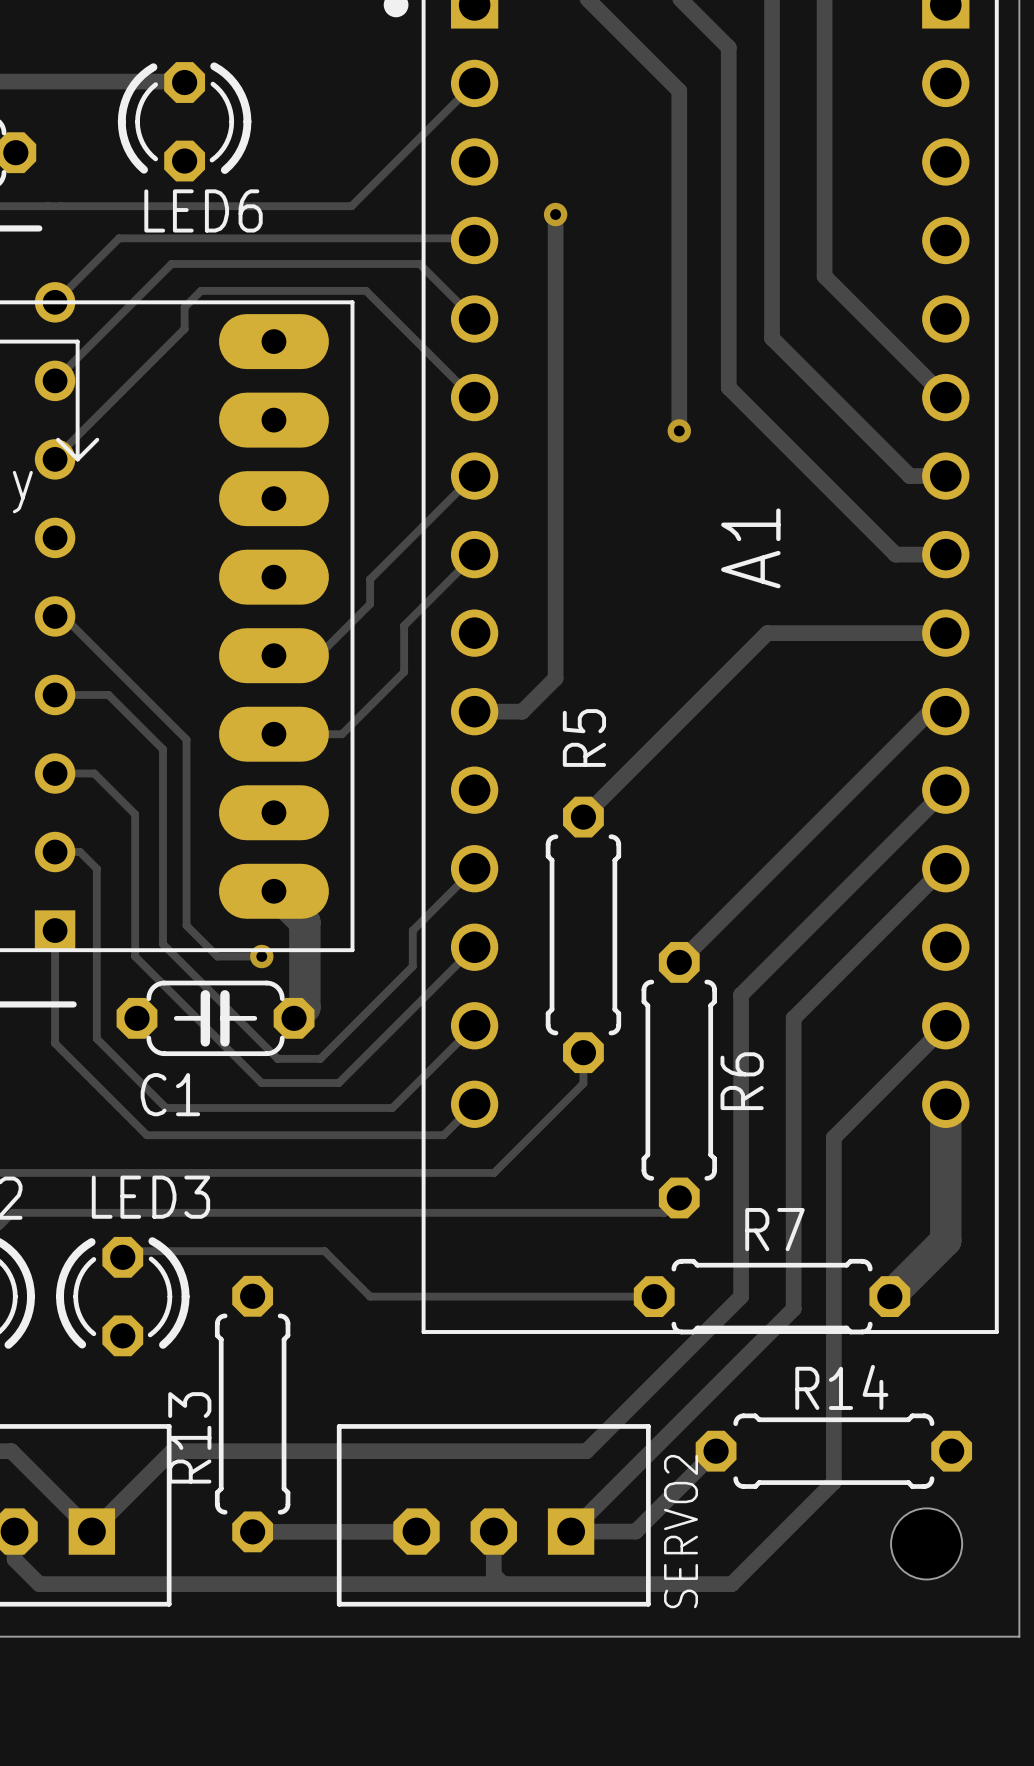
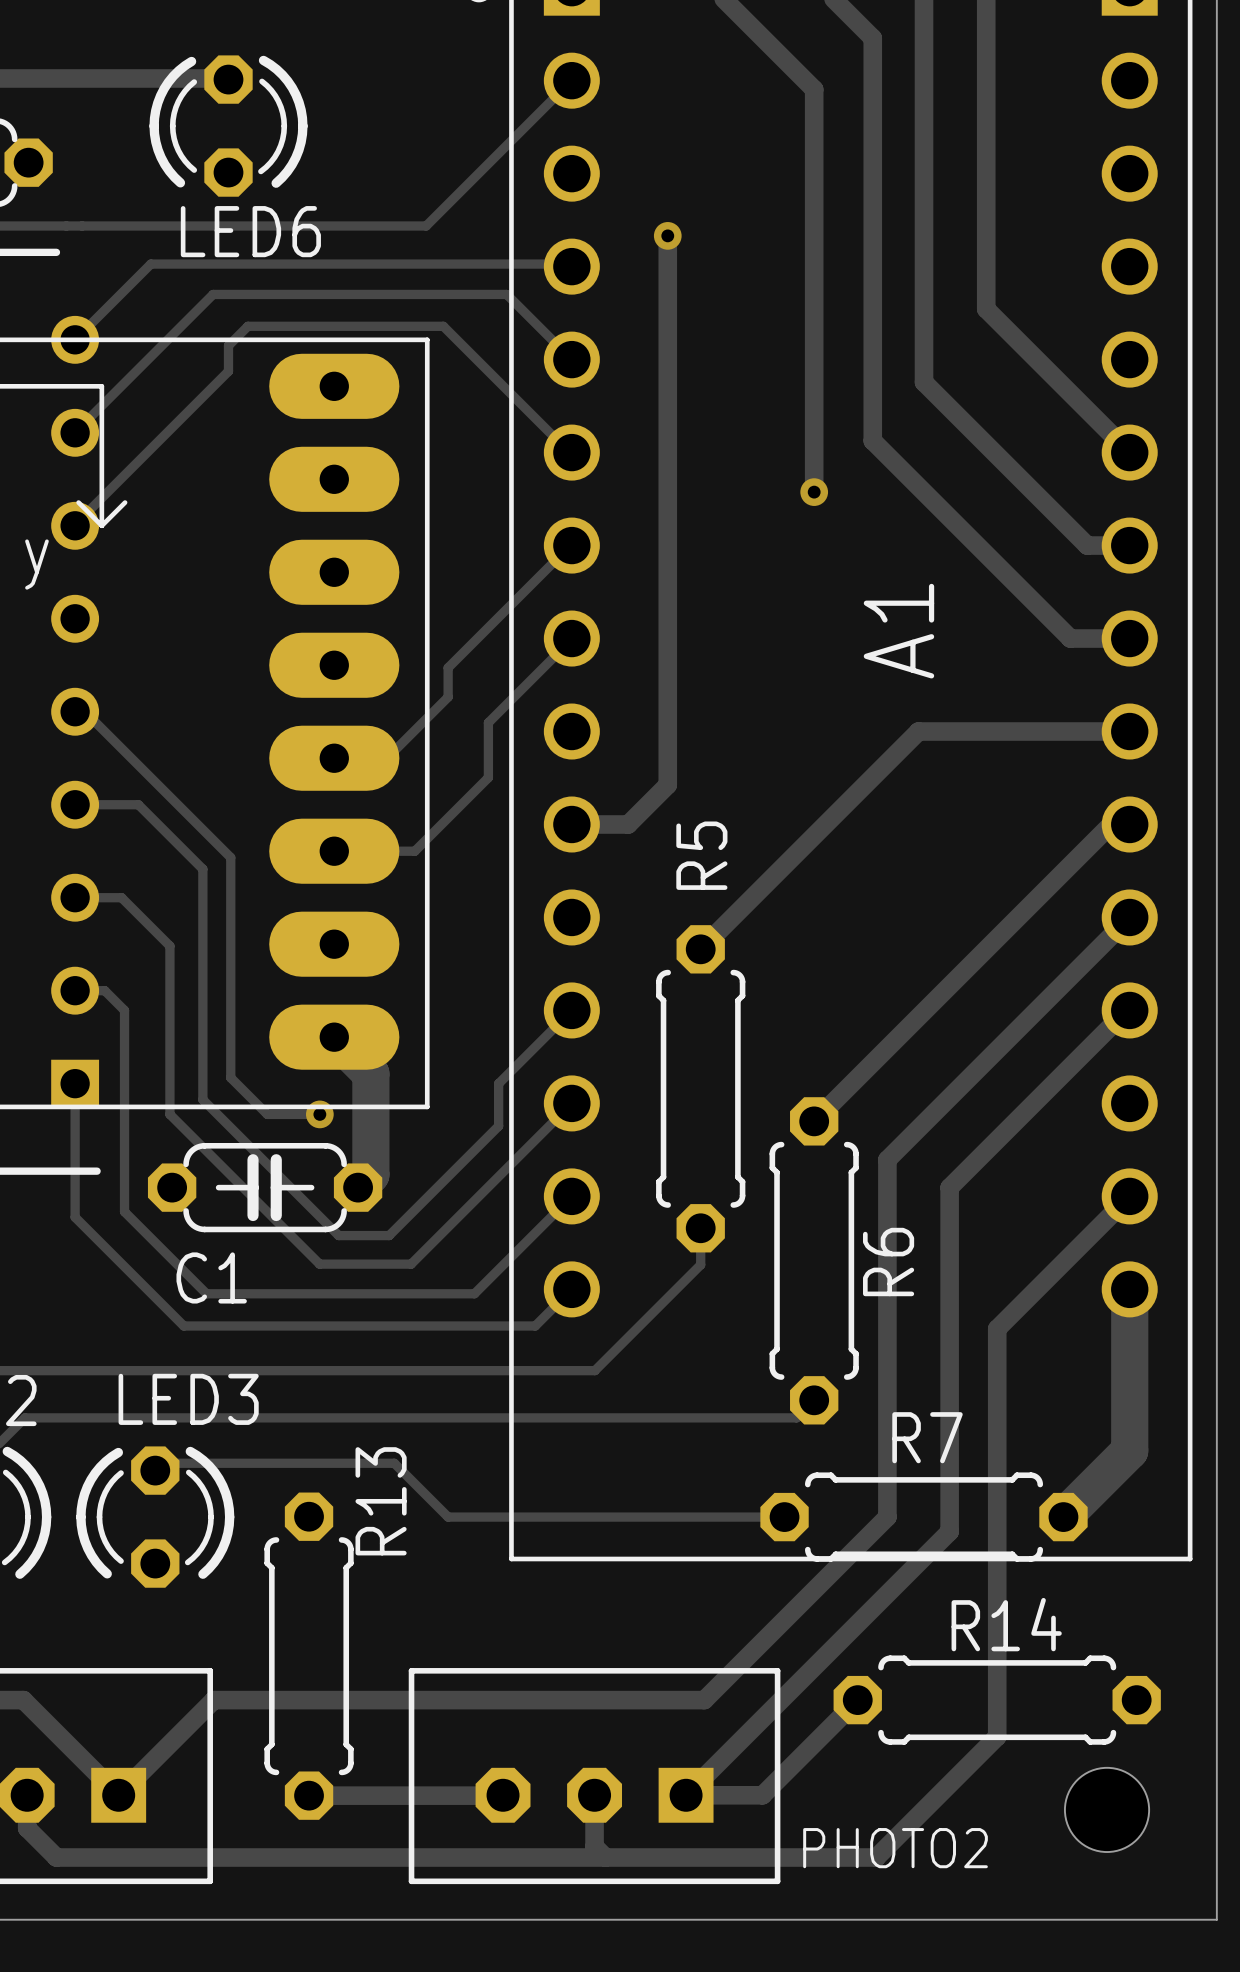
R13 name position: R13 (189, 1437) -> R13 (381, 1501)
SERVO2 name: SERVO2 (681, 1531) -> PHOTO2 (895, 1848)

